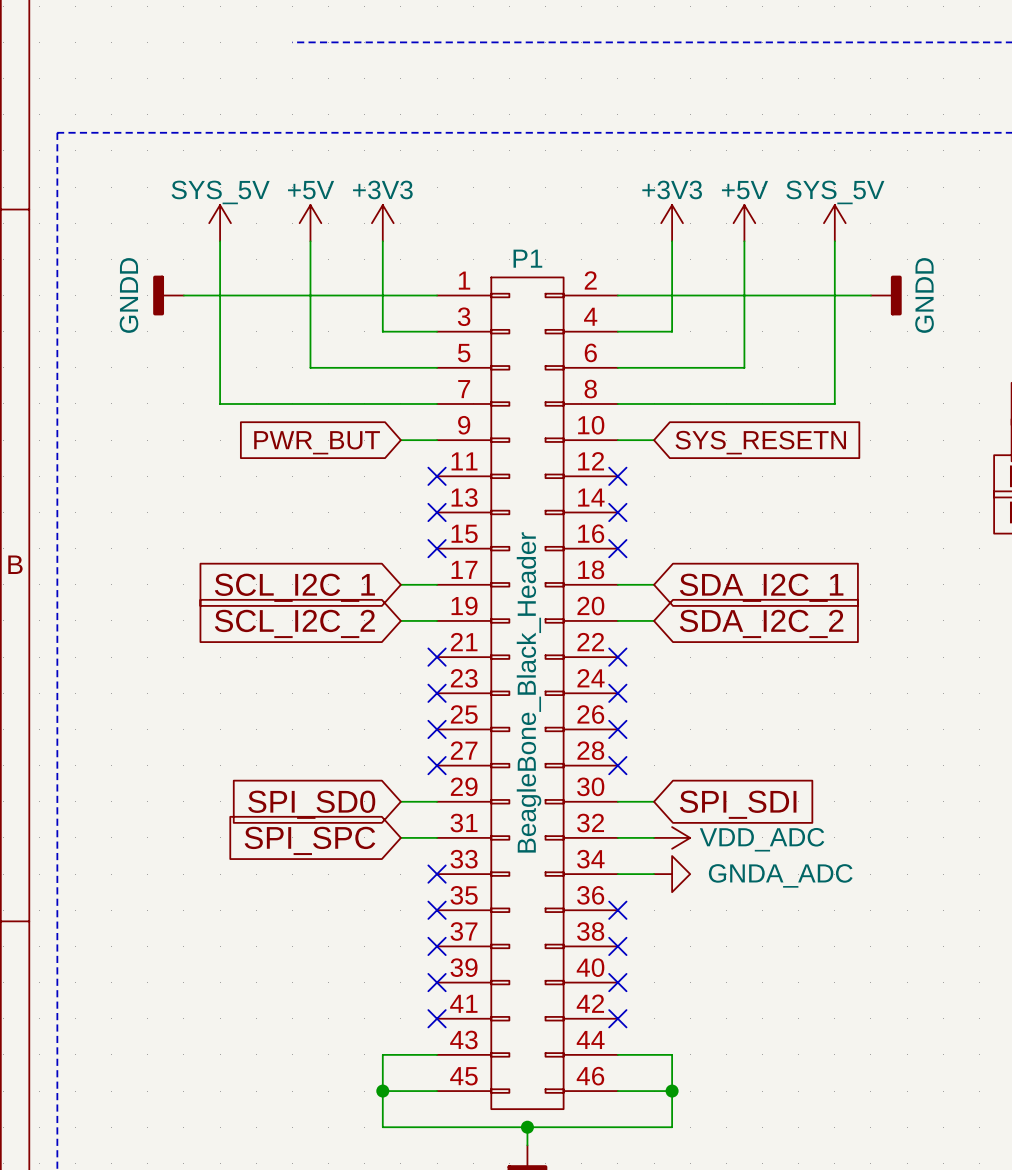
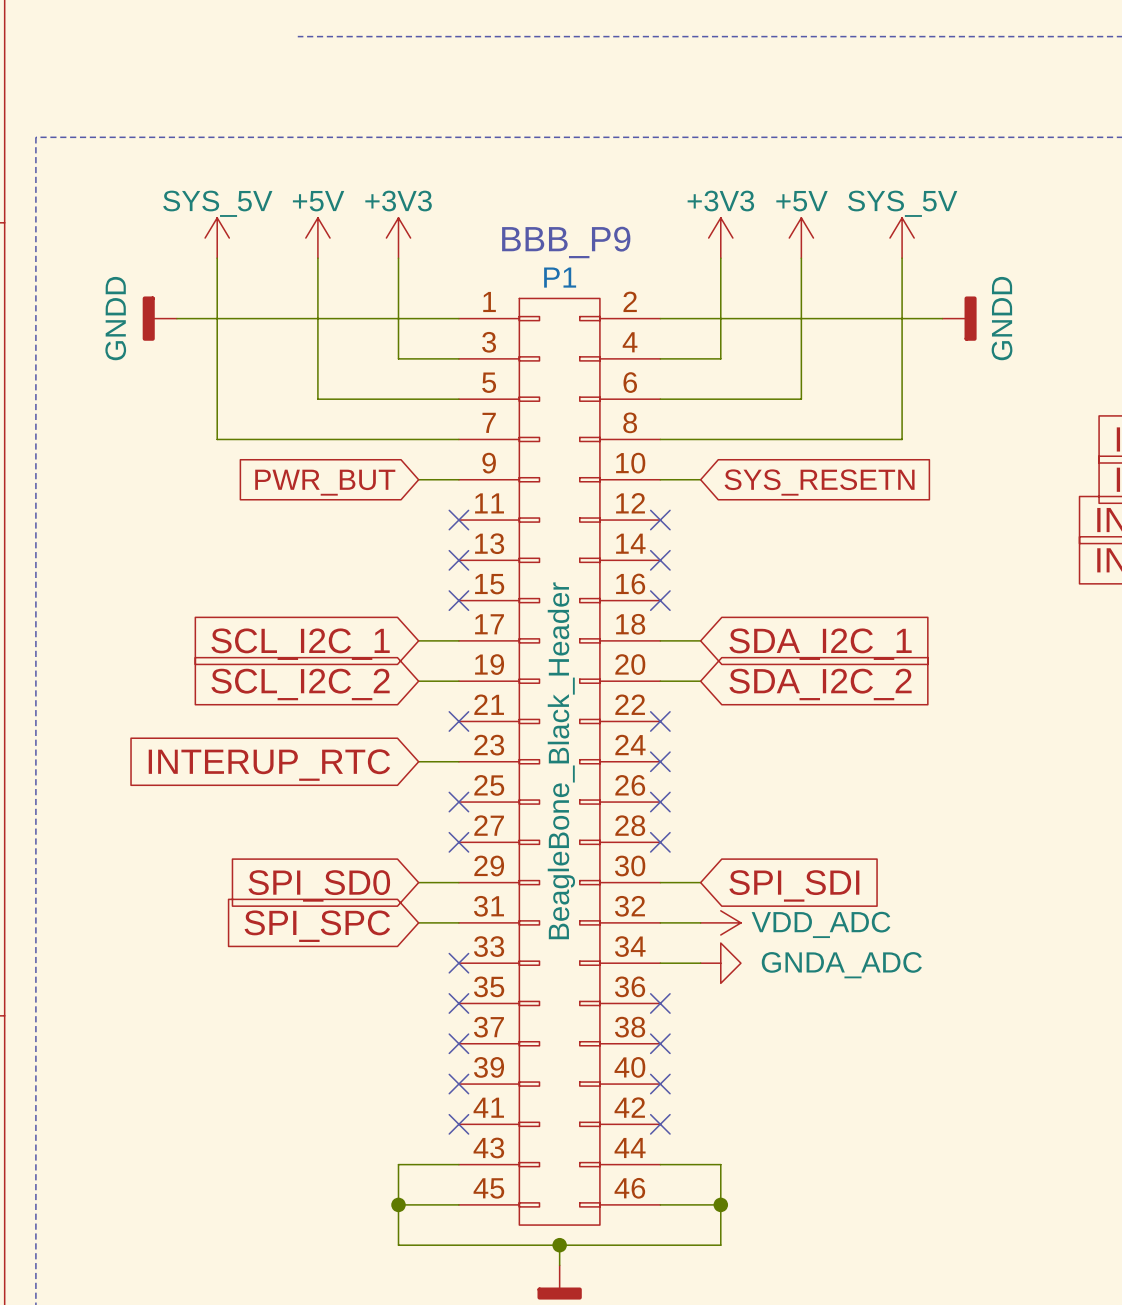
text: none -> BBB_P9 (566, 242)
wire: none -> (418, 761) (458, 761)
no-connect mark: (437, 693) -> none
global label: none -> INTERUP_RTC (269, 765)

